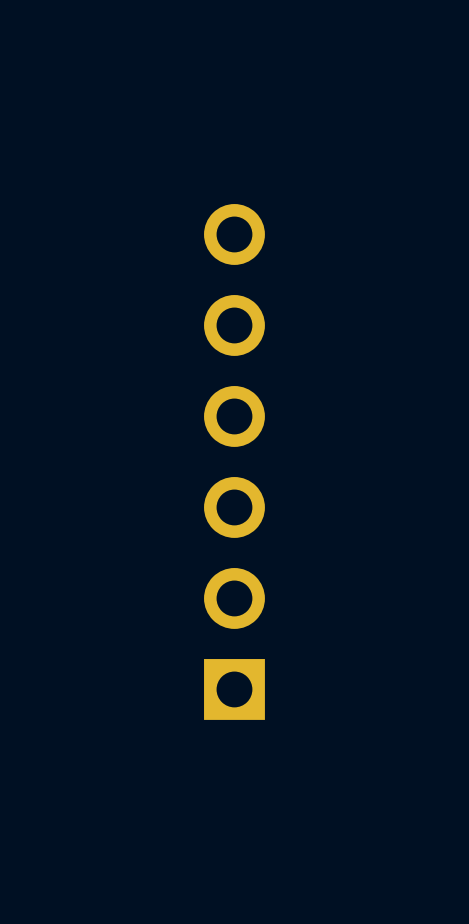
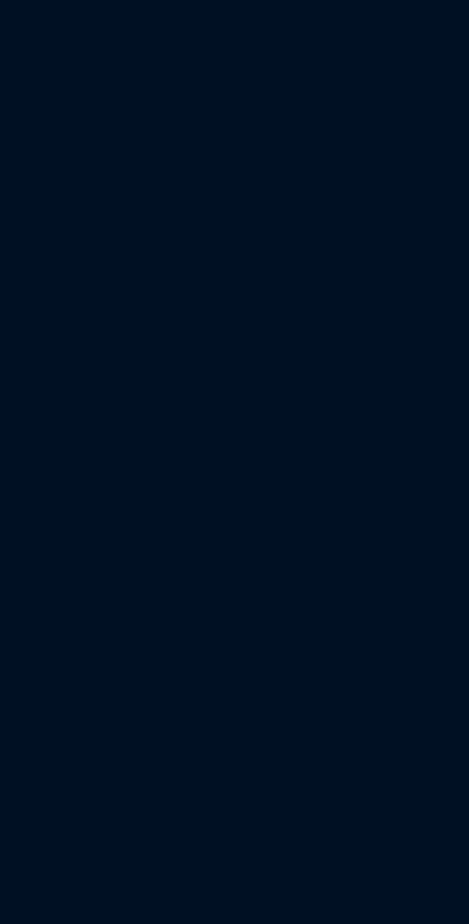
part: (234, 461) -> none

